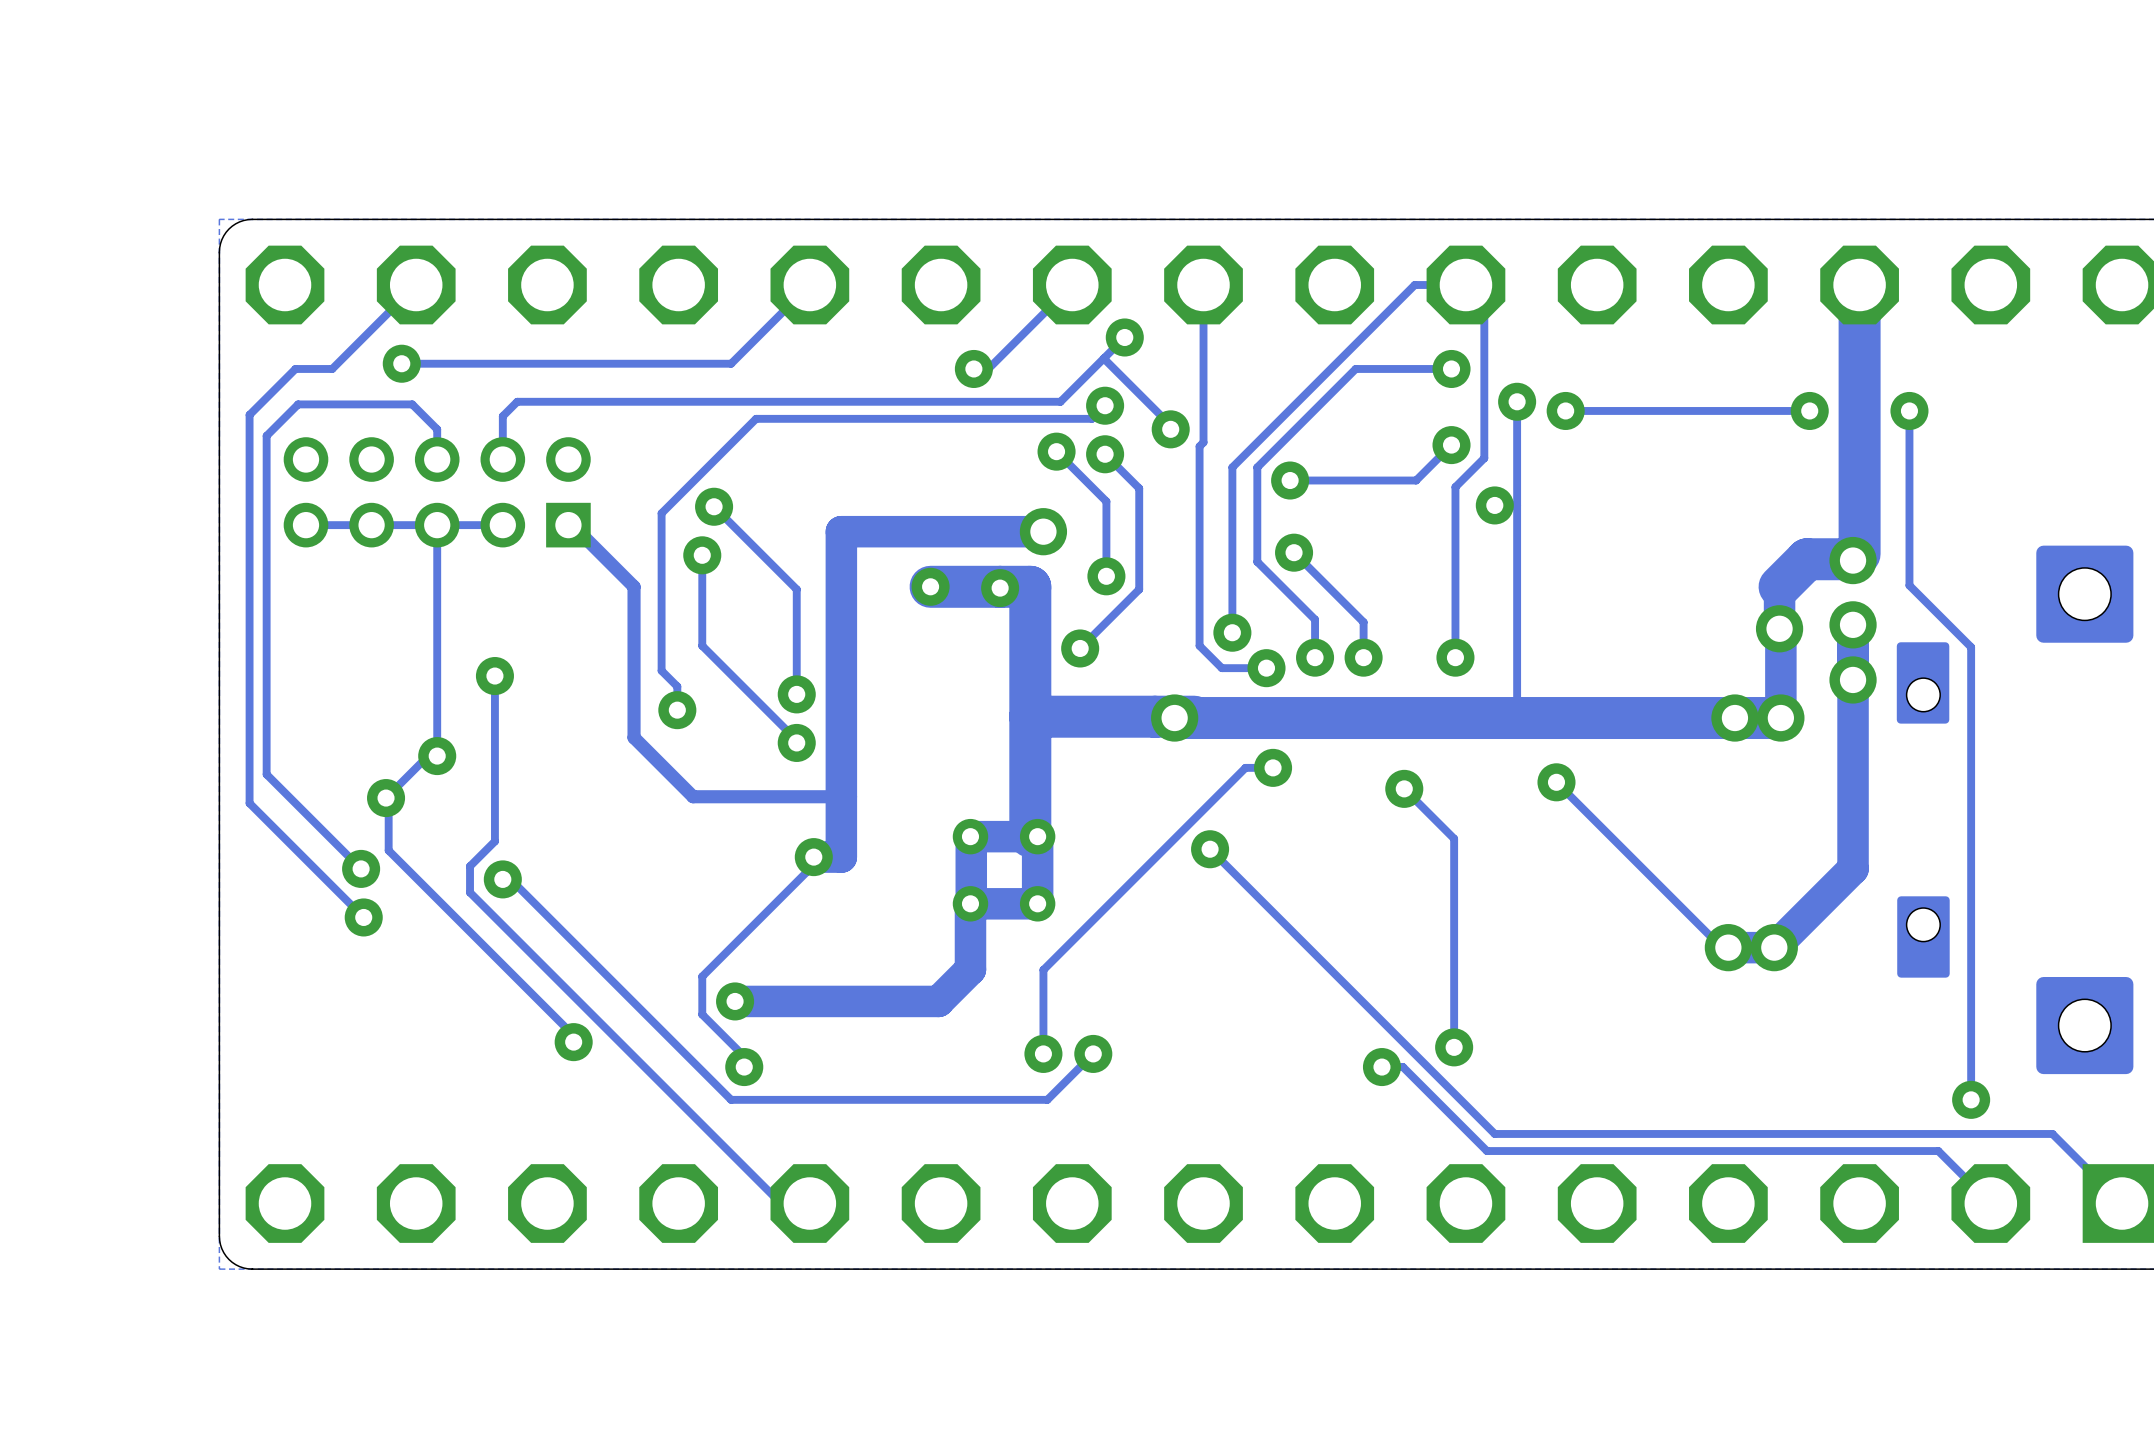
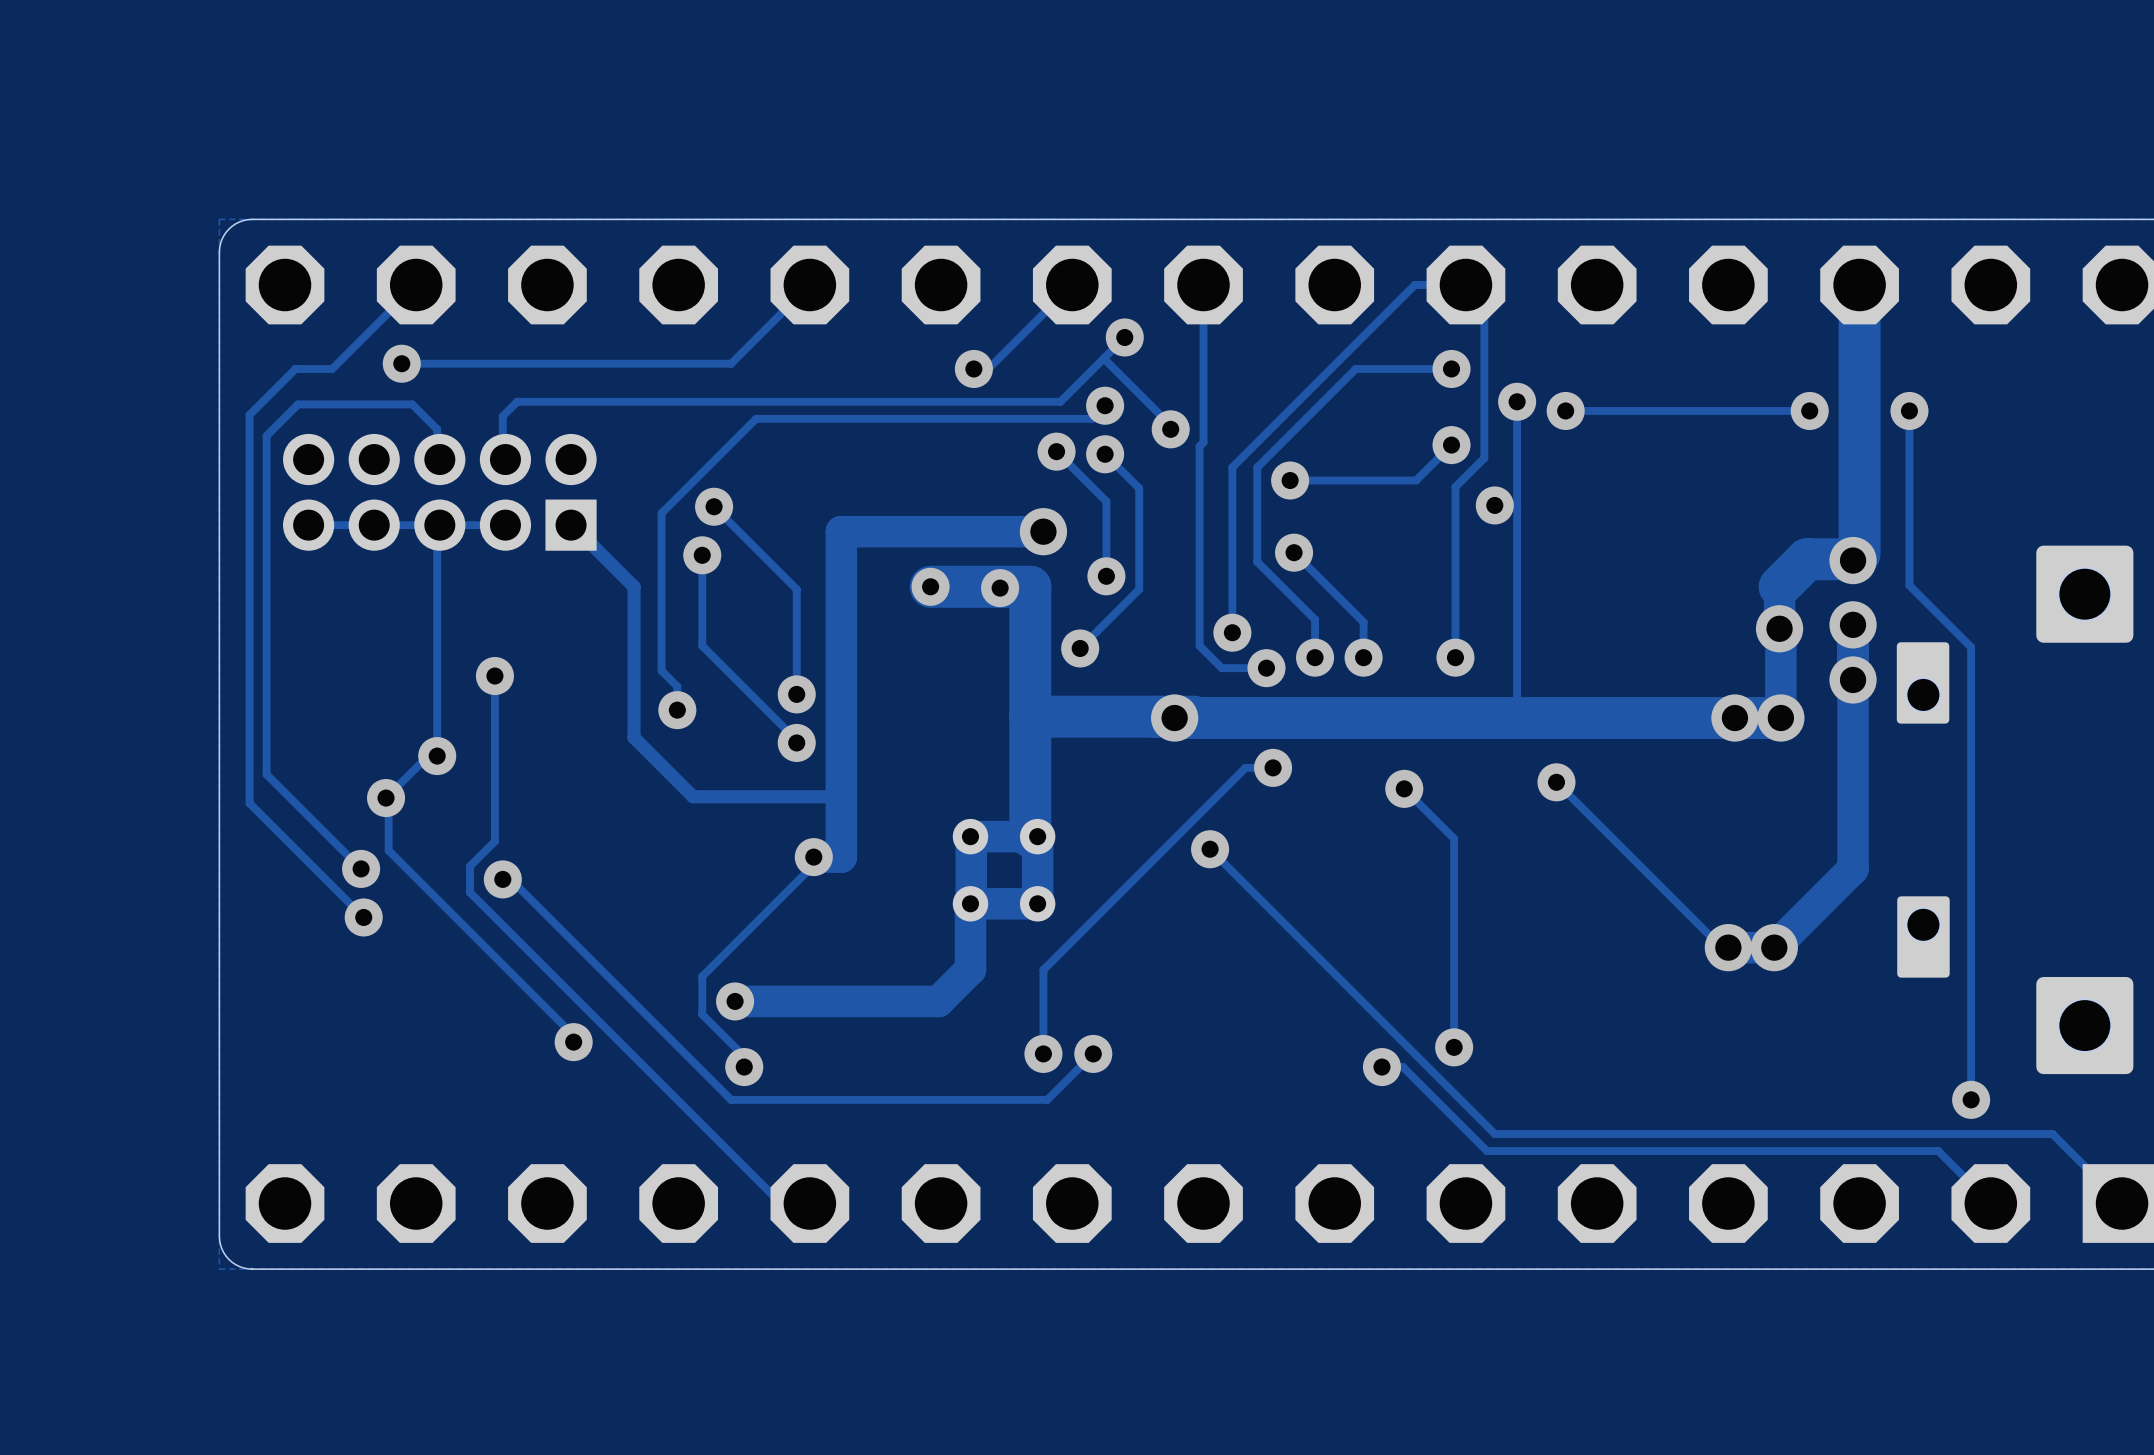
part footprint: [283, 437, 591, 548] -> [283, 433, 597, 551]

